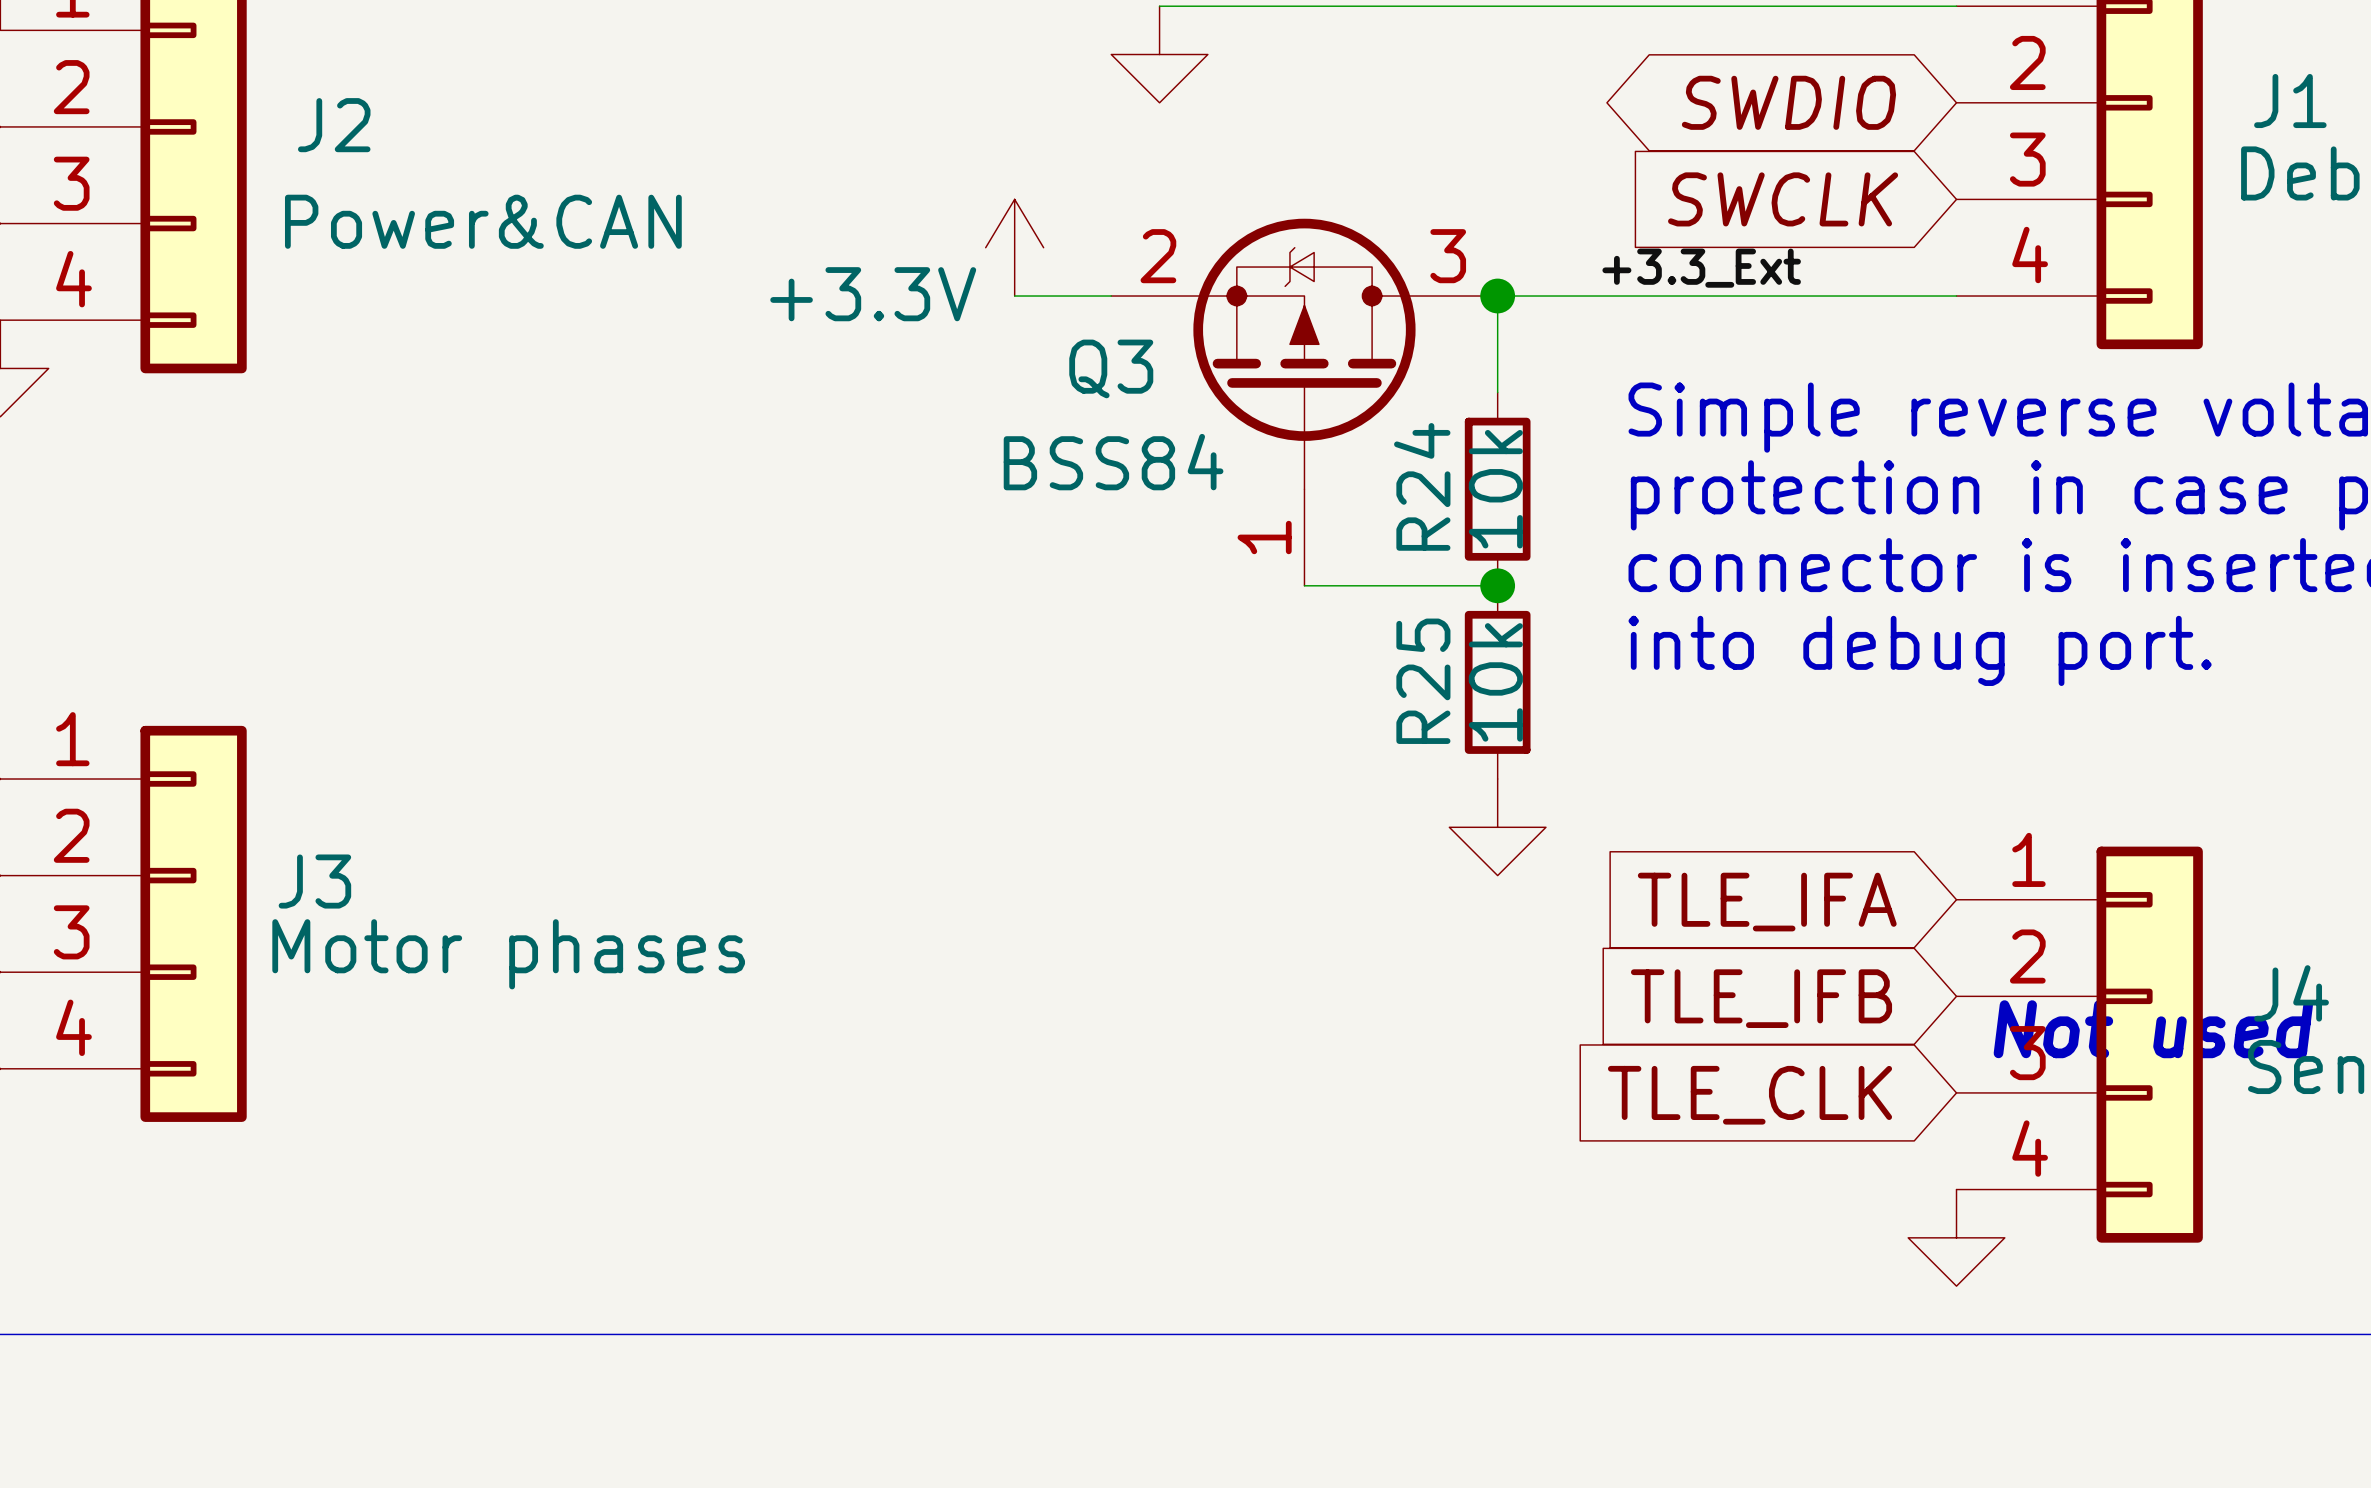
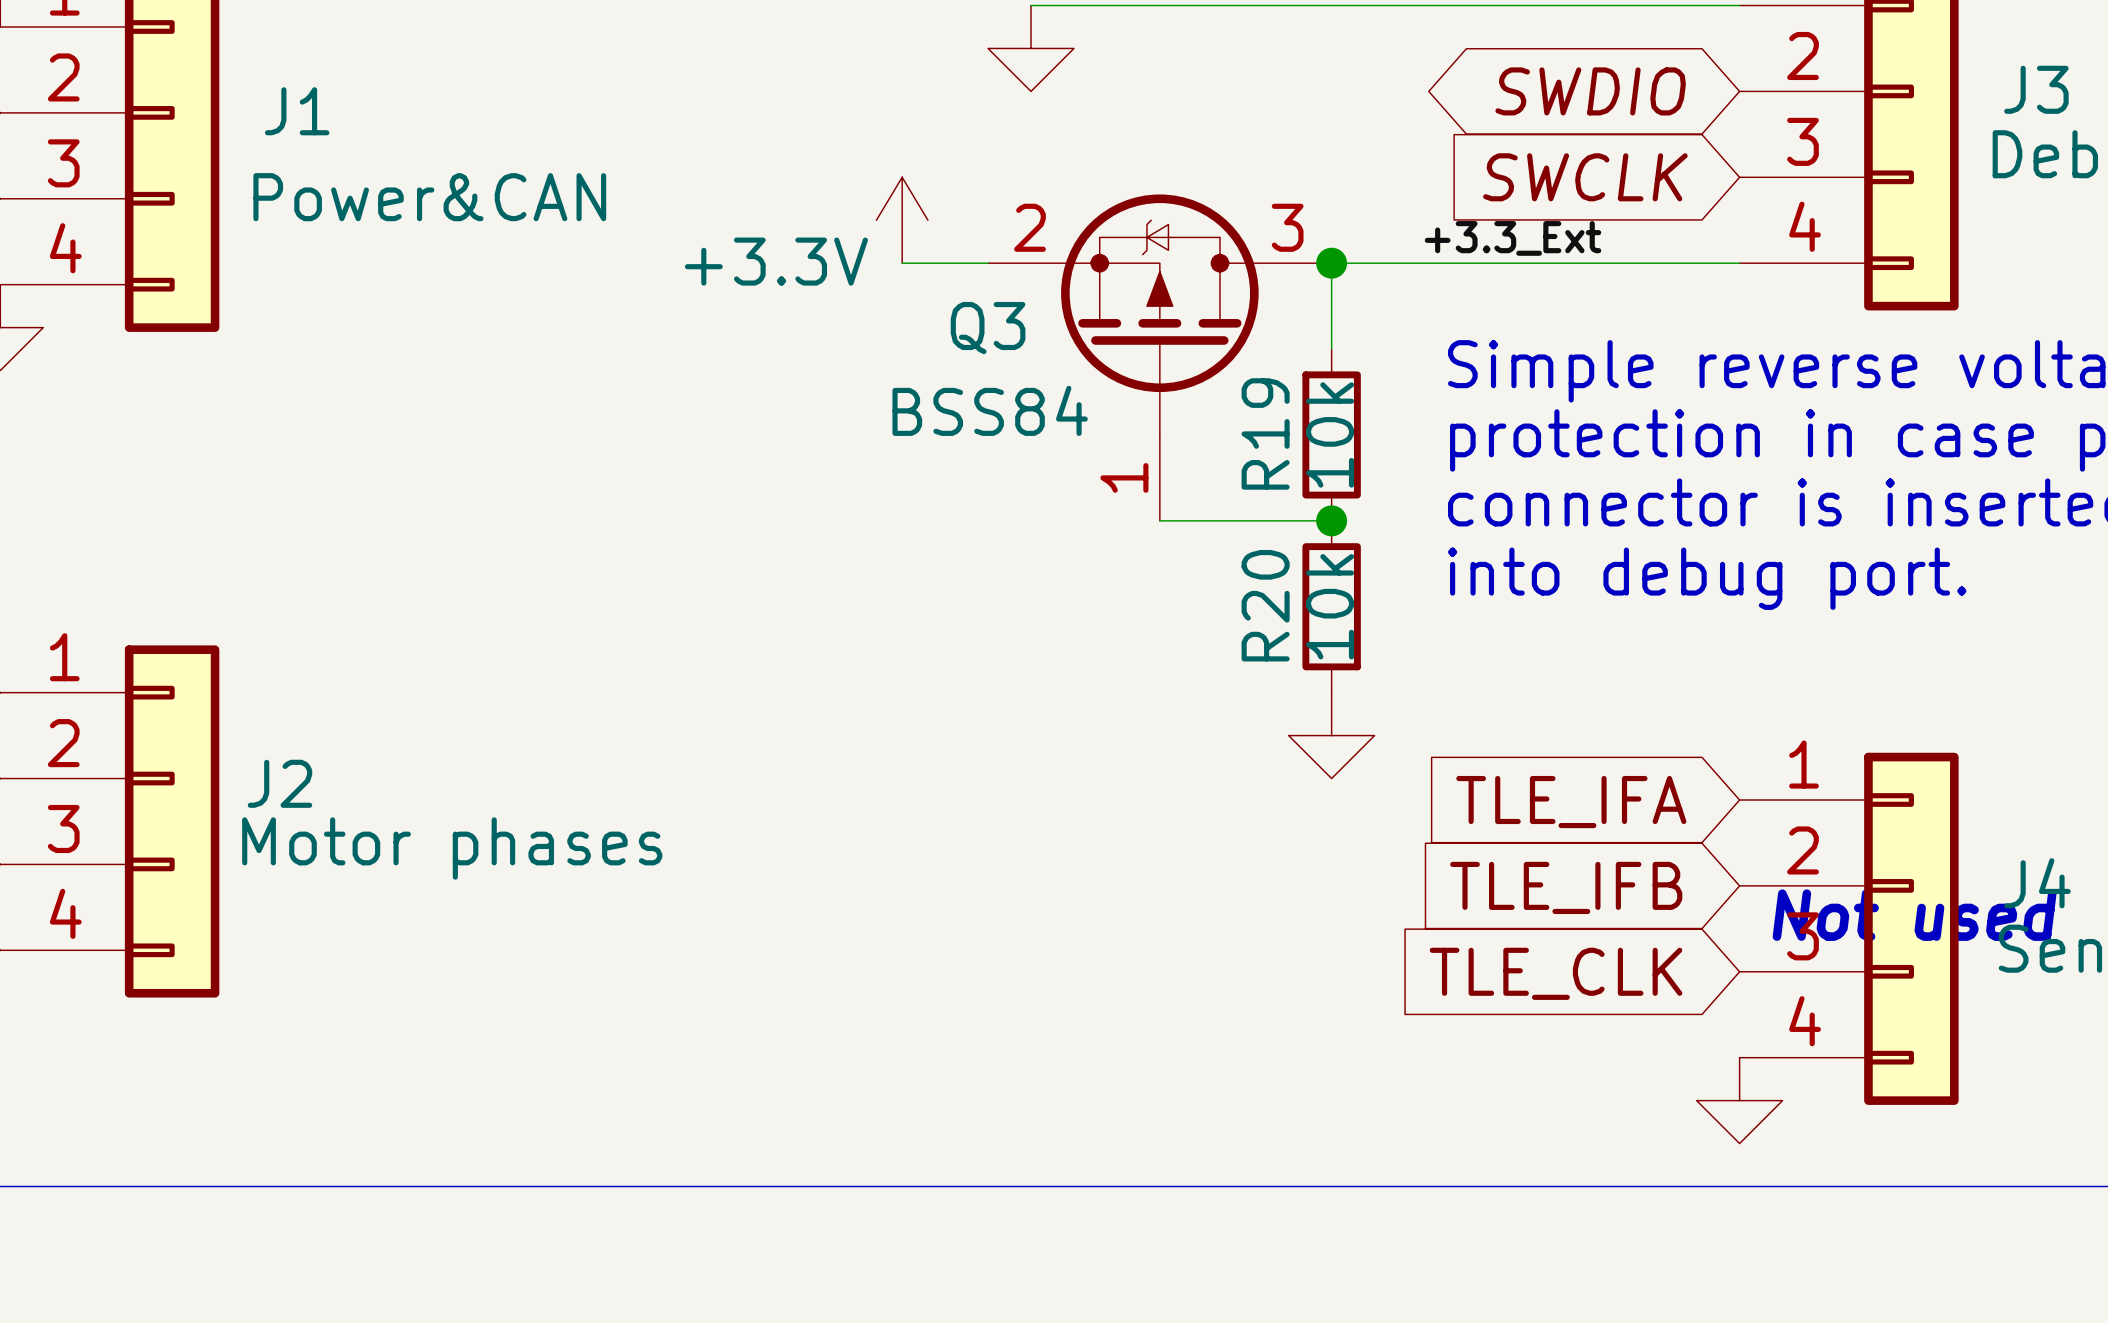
J1 name: J1 (2290, 101) -> J3 (2036, 89)
J2 name: J2 (334, 125) -> J1 (297, 111)
R24 name: R24 (1422, 486) -> R19 (1265, 433)
R25 name: R25 (1423, 681) -> R20 (1265, 605)
J3 name: J3 (314, 881) -> J2 (280, 783)

